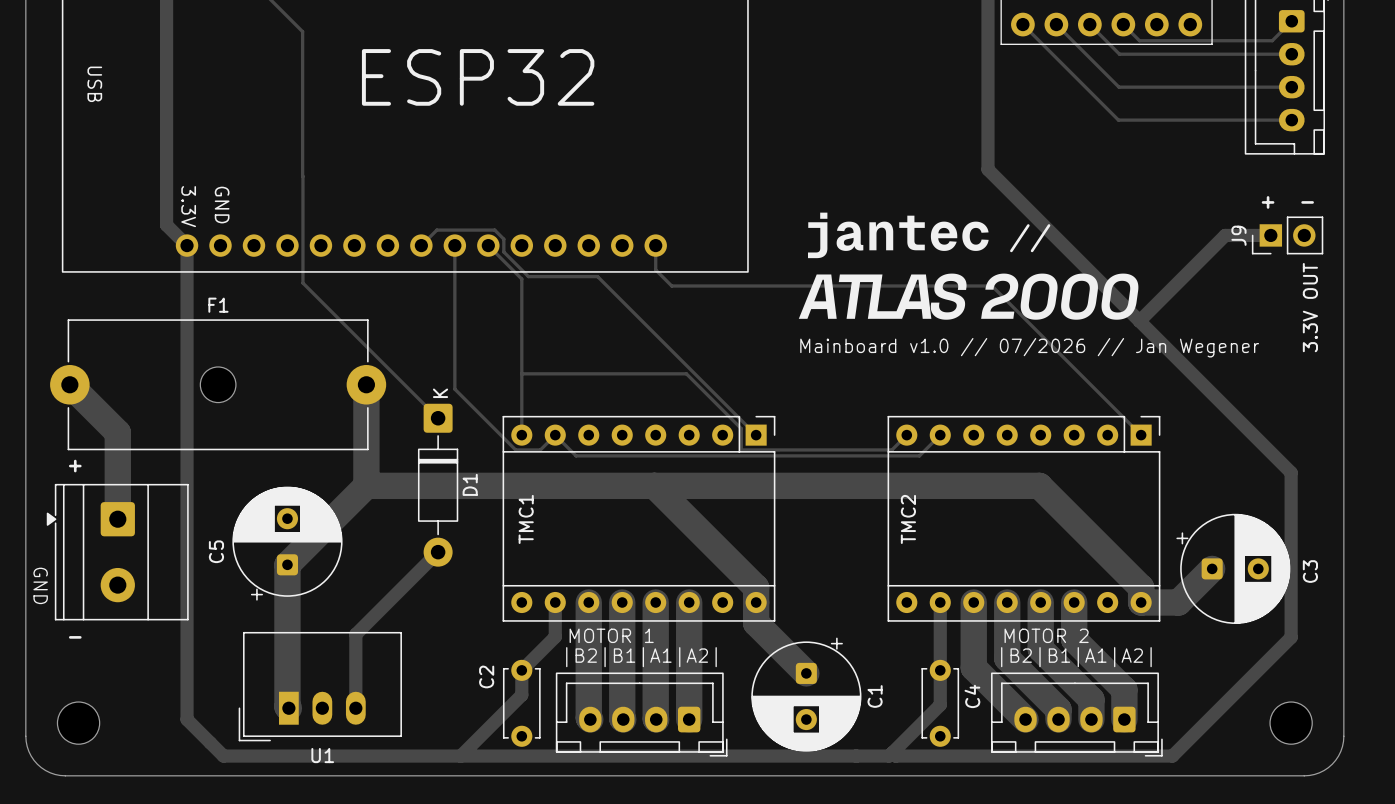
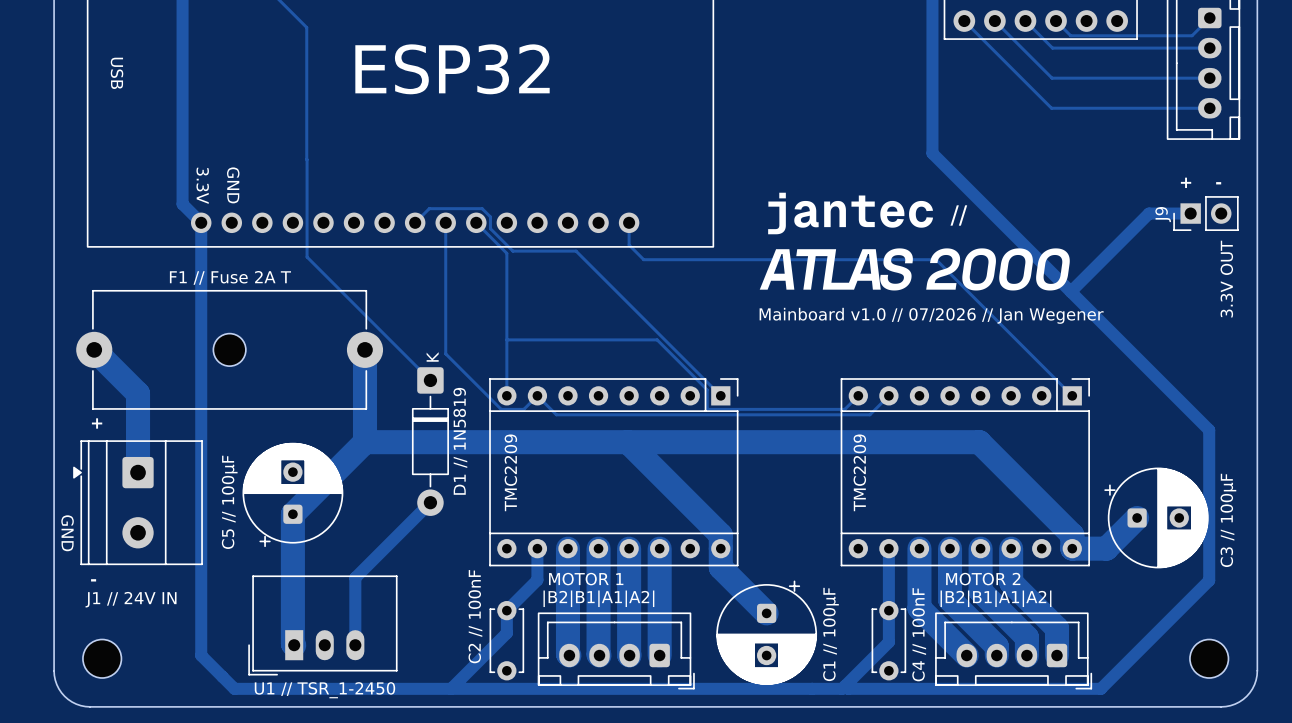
F1 name: F1 (218, 305) -> F1 // Fuse 2A T (230, 277)
D1 name: D1 (470, 484) -> D1 // 1N5819 (460, 441)
TMC1 name: TMC1 (526, 519) -> TMC2209 (510, 472)
TMC2 name: TMC2 (908, 519) -> TMC2209 (859, 472)
C5 name: C5 (216, 551) -> C5 // 100µF (229, 502)
C3 name: C3 (1310, 571) -> C3 // 100µF (1228, 520)
part value: none -> J1 // 24V IN (131, 599)
C2 name: C2 (486, 676) -> C2 // 100nF (475, 616)
C1 name: C1 (875, 696) -> C1 // 100µF (830, 634)
C4 name: C4 (972, 696) -> C4 // 100nF (919, 634)
U1 name: U1 (322, 755) -> U1 // TSR_1-2450 (324, 690)

